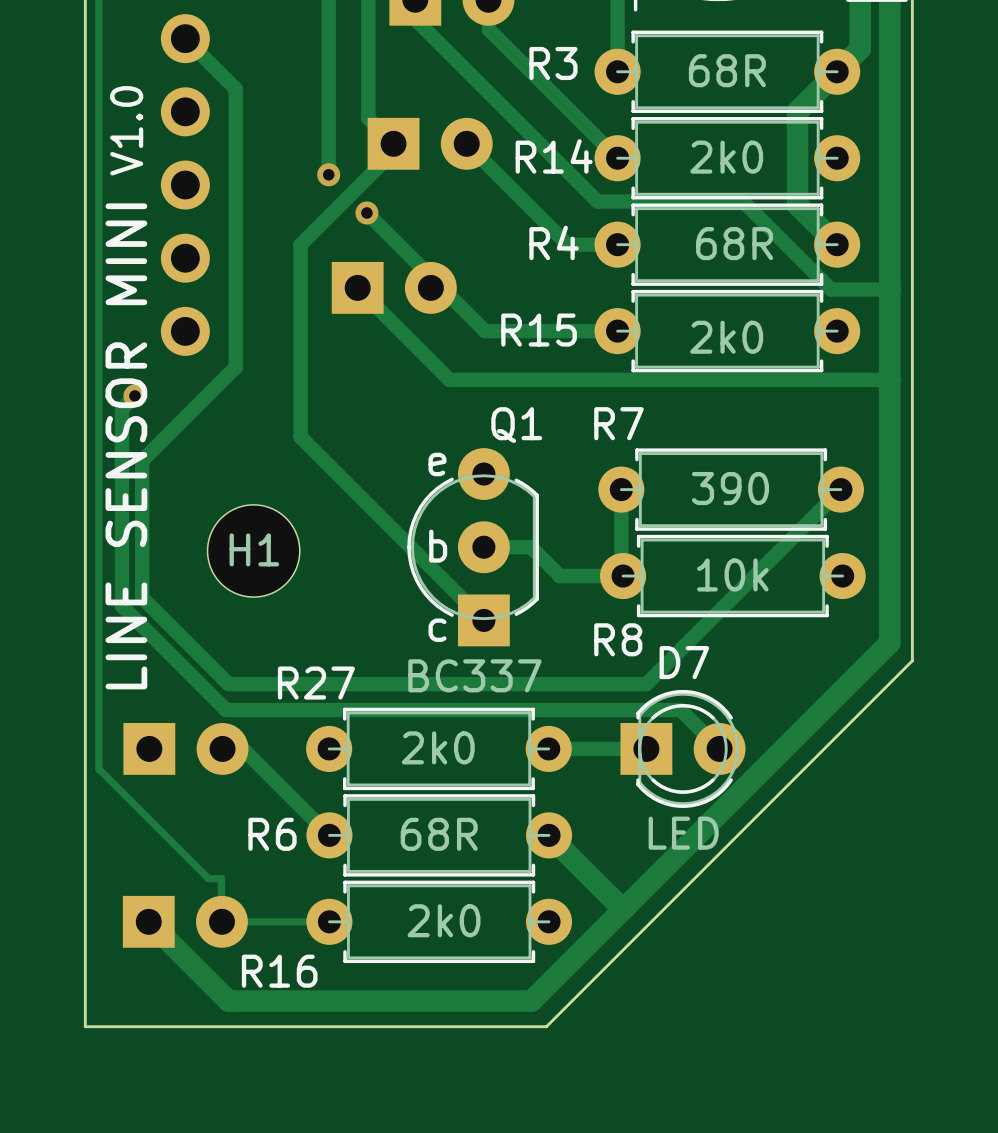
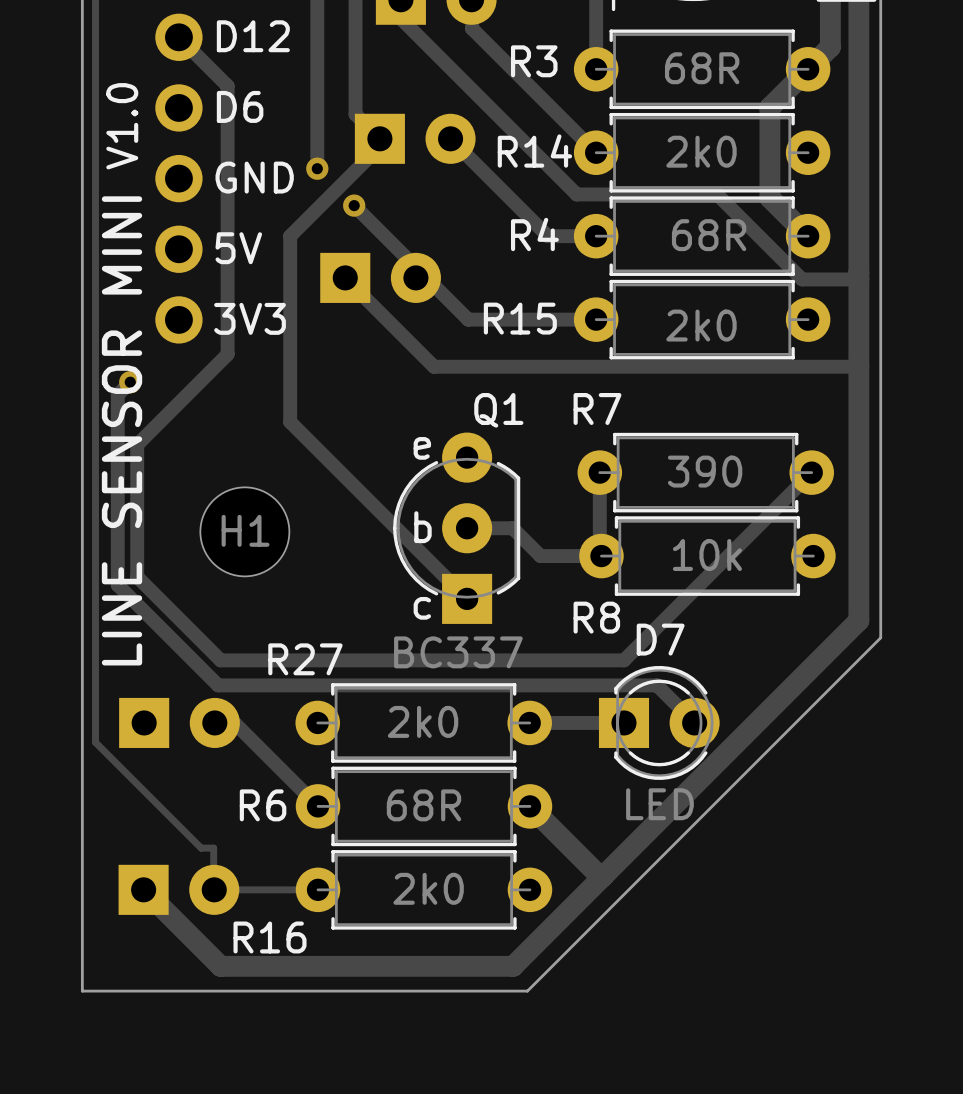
text: none -> D12 (253, 36)
text: none -> D6 (240, 106)
text: none -> GND (254, 177)
text: none -> 5V (238, 248)
text: none -> 3V3 (250, 318)

